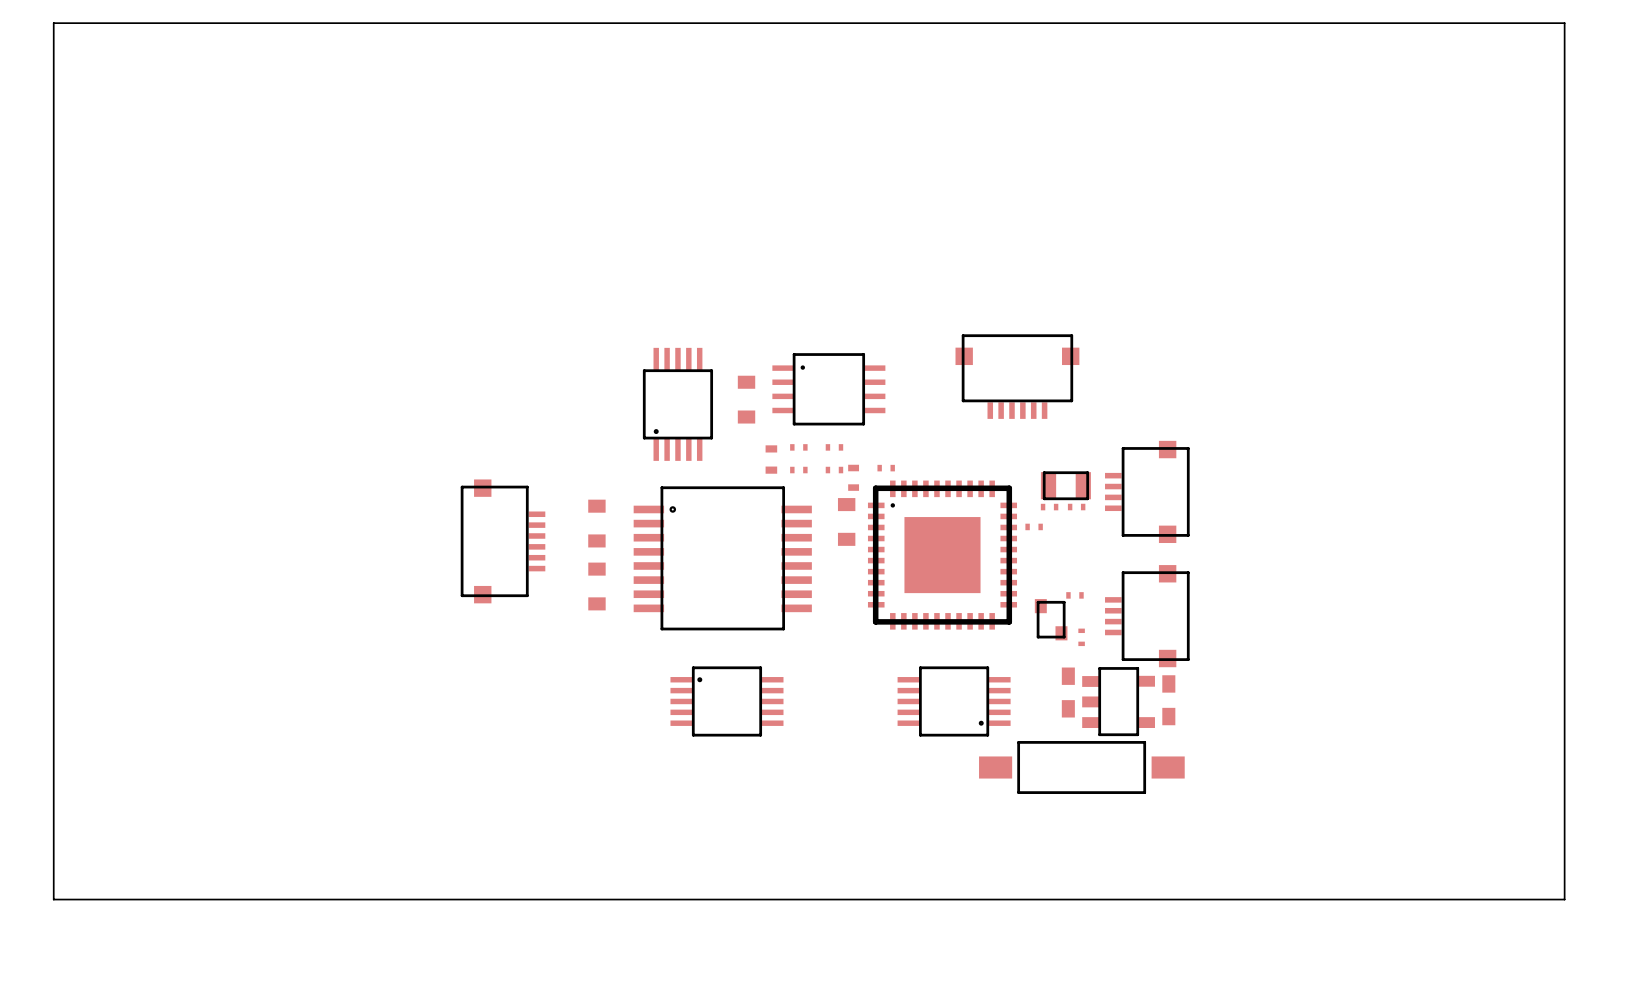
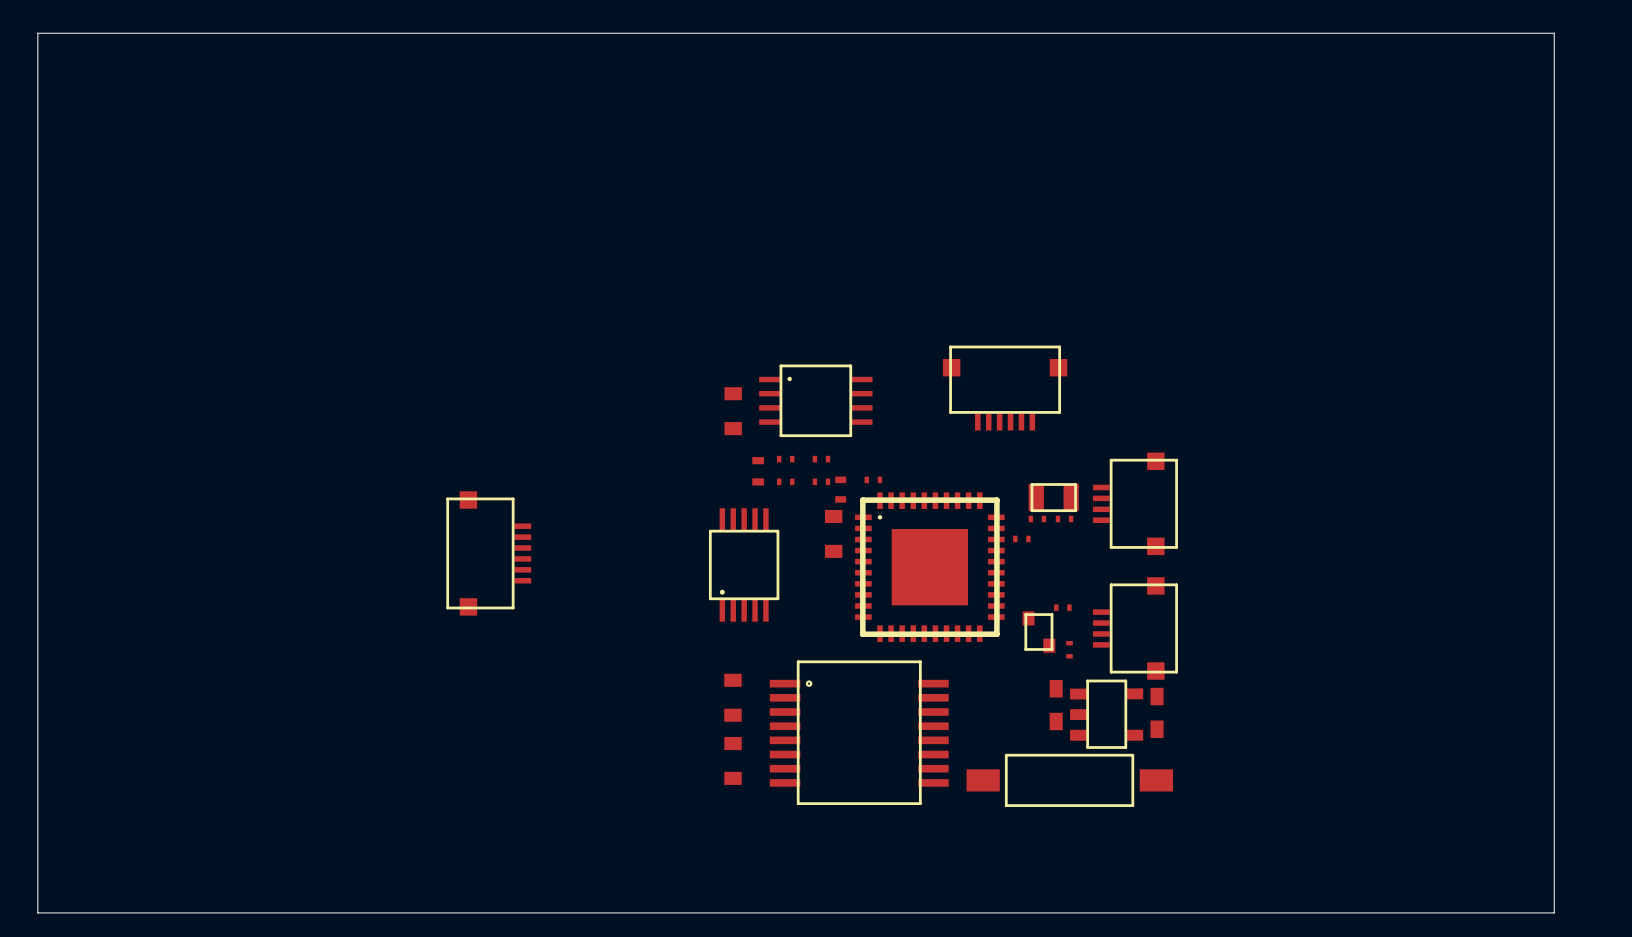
part: (677, 404) -> none
part: (596, 523) -> none
part: none -> (744, 564)
part position: (722, 558) -> (859, 732)
part: (596, 586) -> none
part: none -> (732, 697)
part: (726, 701) -> none
part: (954, 701) -> none
part: none -> (733, 760)

